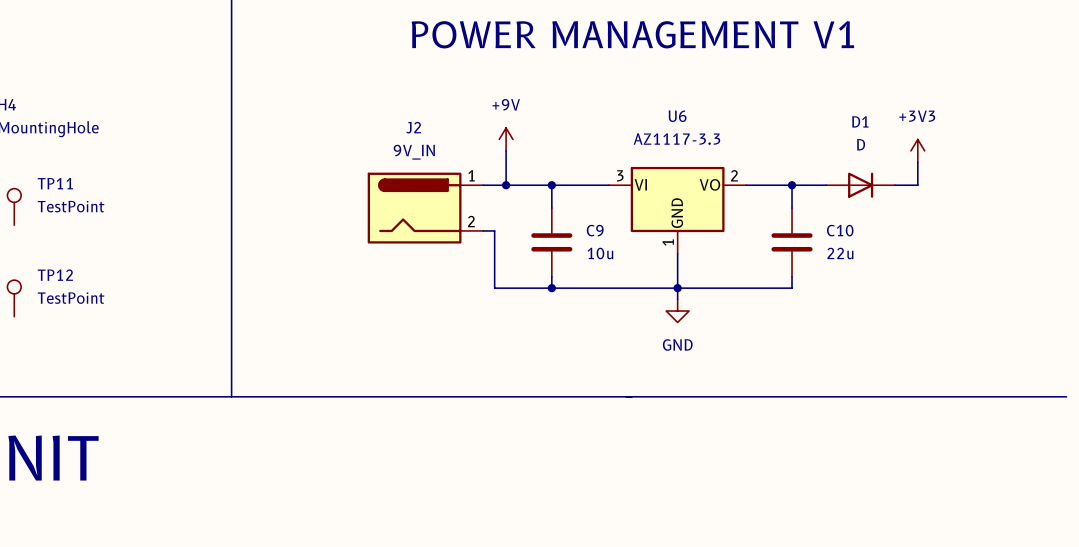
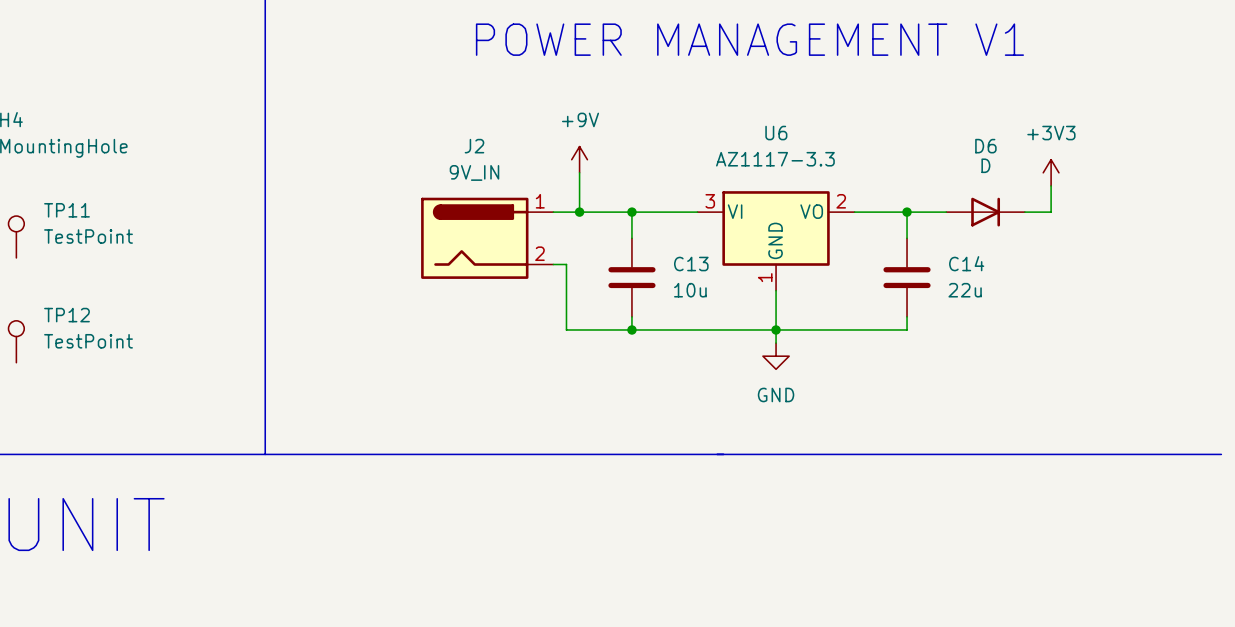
D1 name: D1 (860, 121) -> D6 (985, 146)
C9 name: C9 (595, 230) -> C13 (691, 264)
C10 name: C10 (840, 230) -> C14 (966, 263)

